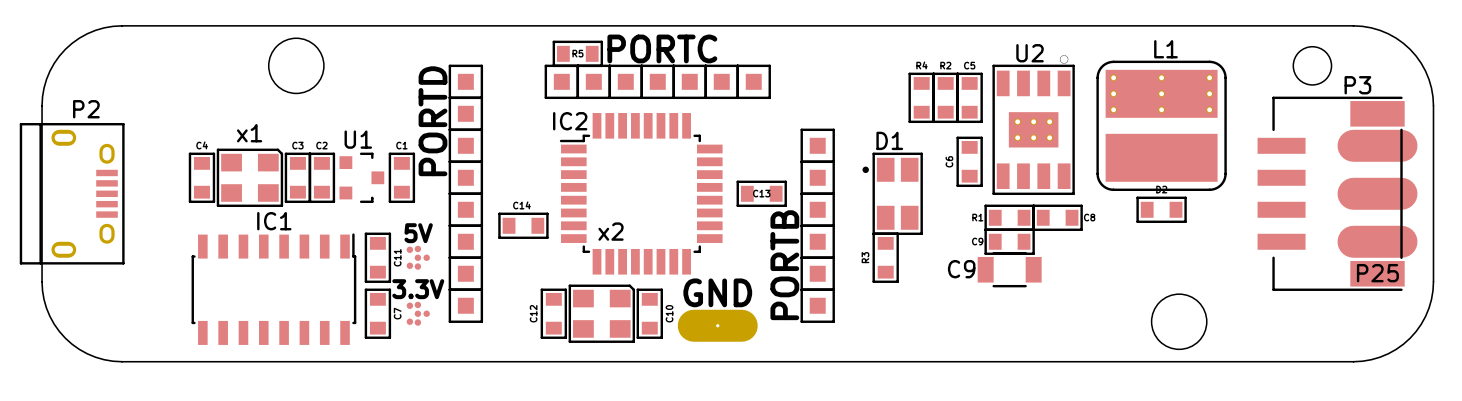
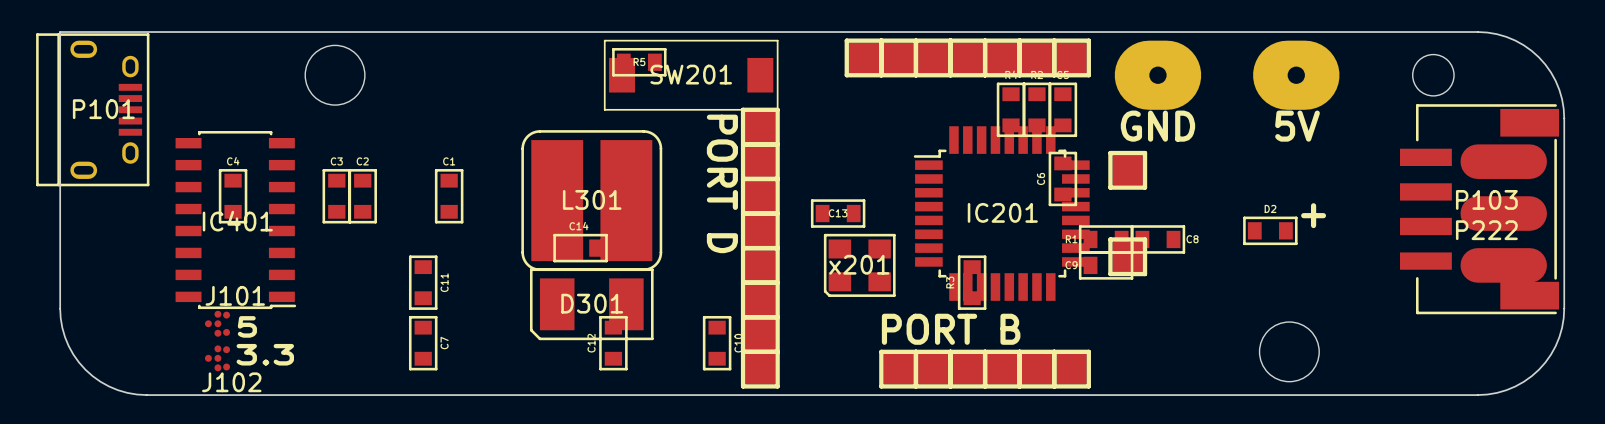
board edge: (122, 25) (95, 30) (79, 38) (65, 49) (54, 63) (46, 79) (42, 105) -> (146, 32) (60, 32) (60, 118)
text: PORTC (662, 48) -> none
part: none -> (864, 57)
part: none -> (898, 57)
part: none -> (933, 57)
part: none -> (967, 57)
part: none -> (1002, 57)
part: none -> (1036, 57)
part: none -> (1071, 57)
SW201: none -> (691, 75)
part: none -> (1157, 75)
part: none -> (1296, 75)
part: (1113, 77) -> none
part: (1161, 77) -> none
part: (1209, 77) -> none
part: (465, 81) -> none
part: (561, 81) -> none
part: (593, 81) -> none
part: (625, 81) -> none
part: (657, 81) -> none
part: (689, 81) -> none
part: (721, 81) -> none
part: (753, 81) -> none
part: (1113, 93) -> none
part: (1161, 93) -> none
part: (1209, 93) -> none
P101: none -> (92, 109)
part: (1113, 109) -> none
part: (1161, 109) -> none
part: (1209, 109) -> none
text: none -> 5V (1297, 126)
part: (465, 113) -> none
part: none -> (760, 127)
text: PORTD (432, 121) -> none
part: (1017, 121) -> none
part: (1033, 121) -> none
part: (1049, 121) -> none
U2: (1033, 125) -> none
L1: (1161, 125) -> none
part: (1017, 137) -> none
part: (1033, 137) -> none
part: (1049, 137) -> none
part: (465, 145) -> none
part: none -> (760, 161)
part: (817, 145) -> none
part: none -> (1127, 170)
text: none -> PORT D (722, 183)
x1: (249, 177) -> none
U1: (361, 177) -> none
part: (465, 177) -> none
part: none -> (760, 196)
part: (817, 177) -> none
L301: none -> (591, 200)
P103: none -> (1479, 209)
P2: (72, 193) -> none
IC2: (641, 193) -> none
D1: (892, 193) -> none
IC201: none -> (1001, 213)
P3: (1331, 193) -> none
text: none -> + (1313, 215)
IC401: none -> (235, 220)
part: (465, 209) -> none
part: none -> (760, 230)
part: (817, 209) -> none
text: 5V (418, 233) -> none
part: none -> (1127, 256)
part: (465, 241) -> none
part: none -> (760, 265)
x201: none -> (859, 265)
part: (817, 241) -> none
part: (418, 257) -> none
text: PORTB (784, 265) -> PORT B (951, 329)
C9: (1009, 269) -> none
part: (465, 273) -> none
part: none -> (760, 299)
part: (817, 273) -> none
P25 name: P25 (1377, 273) -> P222 (1486, 230)
D301: none -> (591, 304)
IC1: (273, 289) -> none
text: 3.3V (418, 289) -> none
text position: GND (717, 292) -> GND (1157, 126)
J101: none -> (217, 323)
text: none -> 5 (247, 326)
part: (465, 305) -> none
part: none -> (760, 334)
part: (817, 305) -> none
part: (418, 313) -> none
x2: (601, 313) -> none
text: none -> 3.3 (265, 354)
part: (717, 325) -> none
J102: none -> (217, 358)
part: none -> (760, 369)
part: none -> (898, 369)
part: none -> (933, 369)
part: none -> (967, 369)
part: none -> (1002, 369)
part: none -> (1036, 369)
part: none -> (1071, 369)

